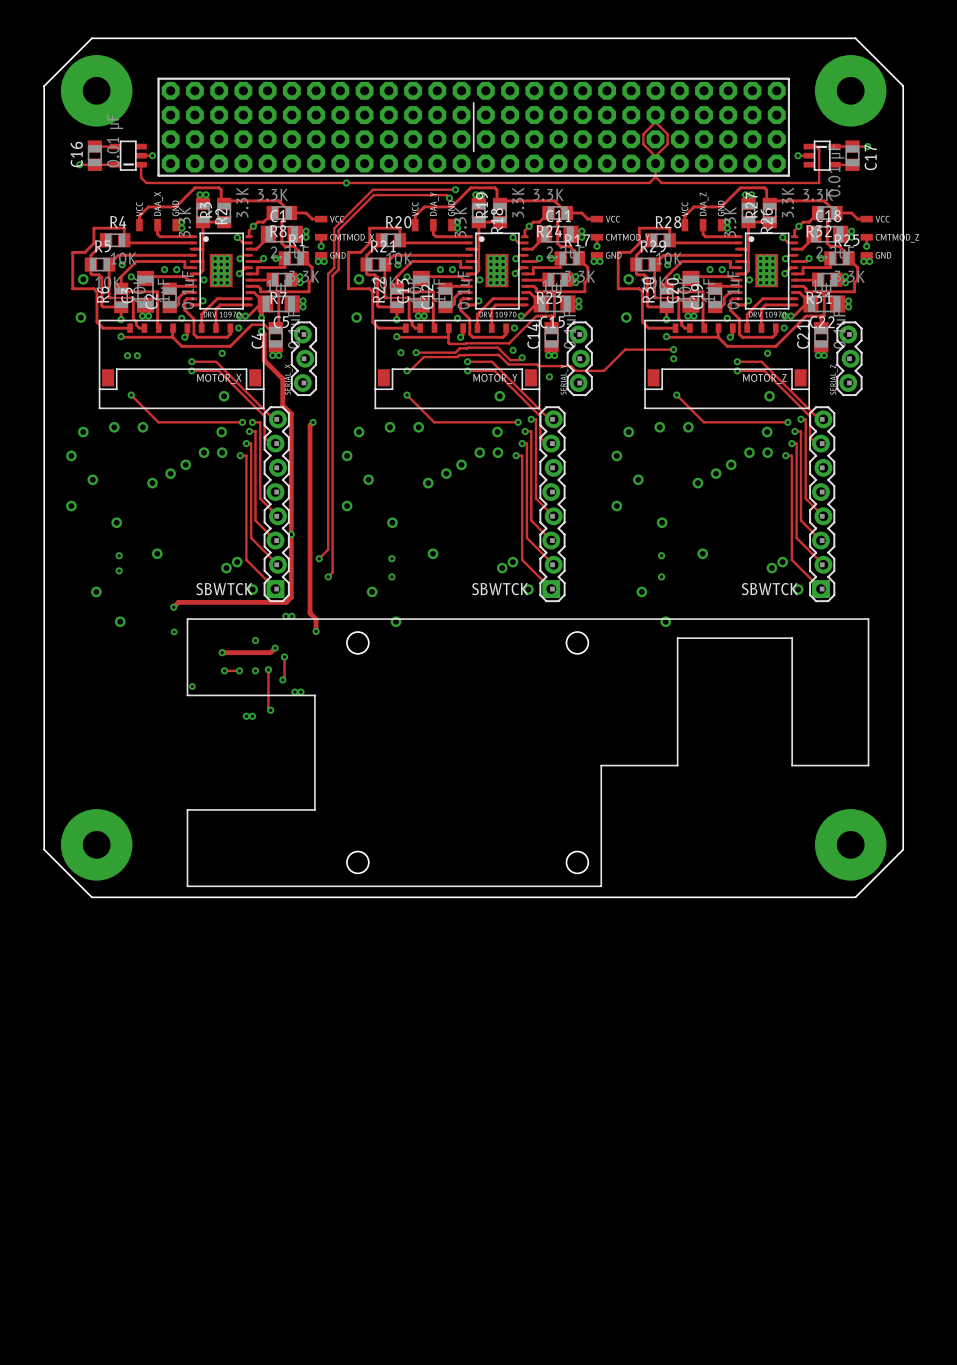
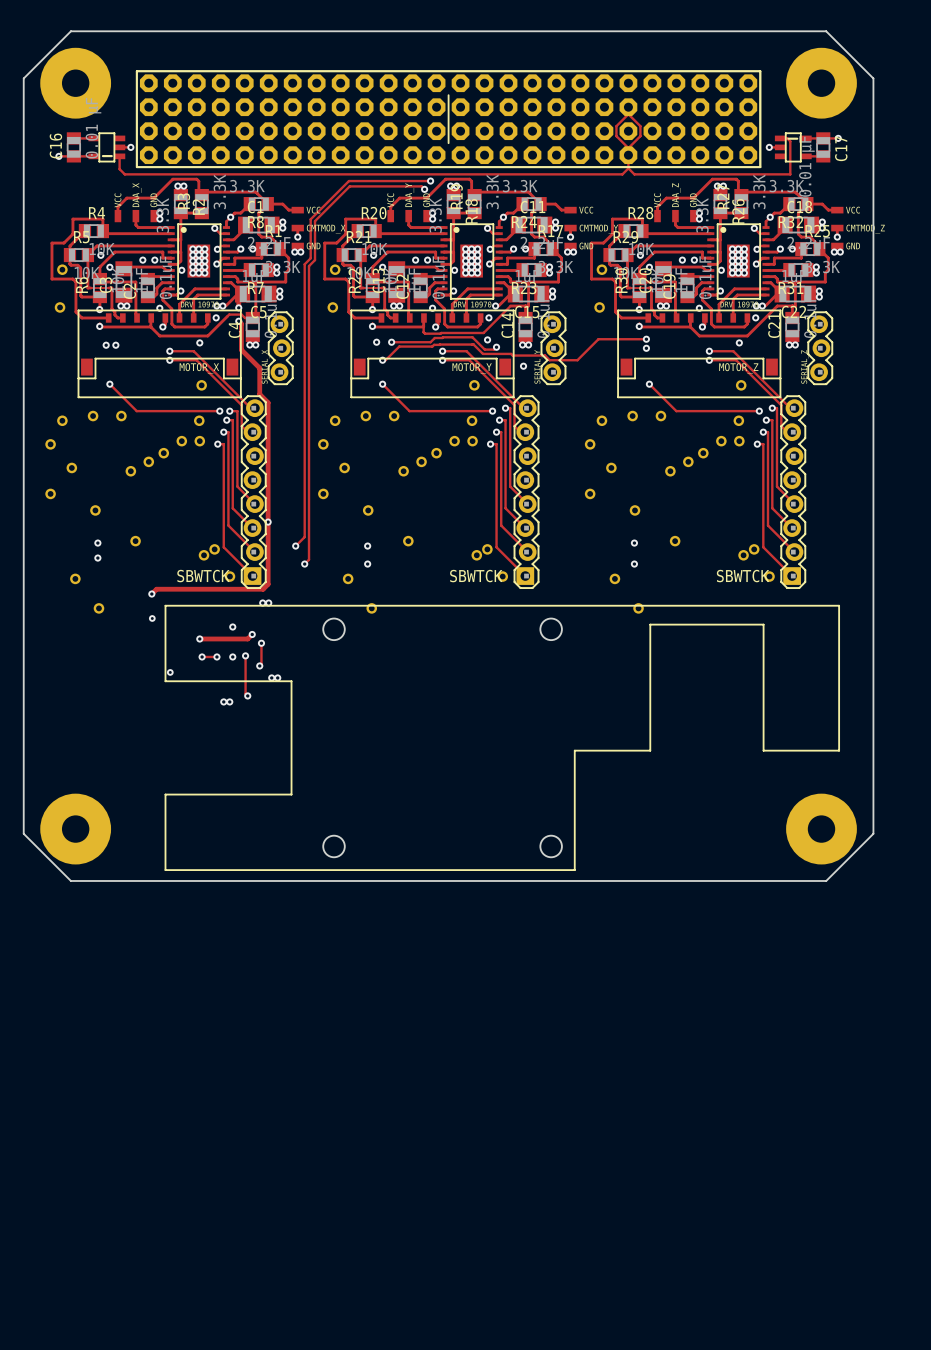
via: (346, 182) -> none
track: (313, 422) (310, 425) (310, 613) (316, 619) (316, 631) -> none
via: (313, 422) -> none
via: (316, 631) -> none

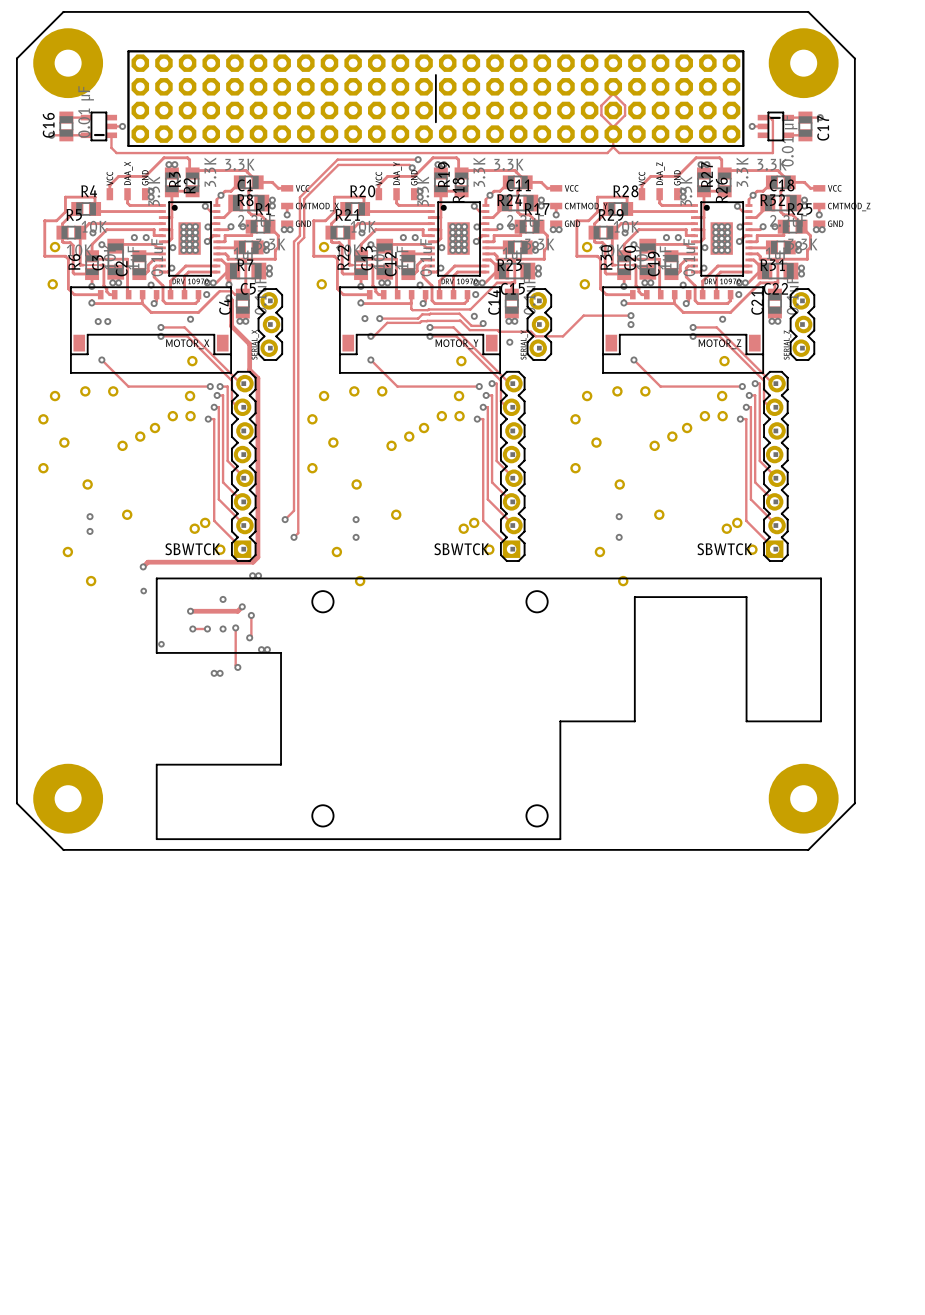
via: none -> (476, 282)
via: (268, 522) -> none

